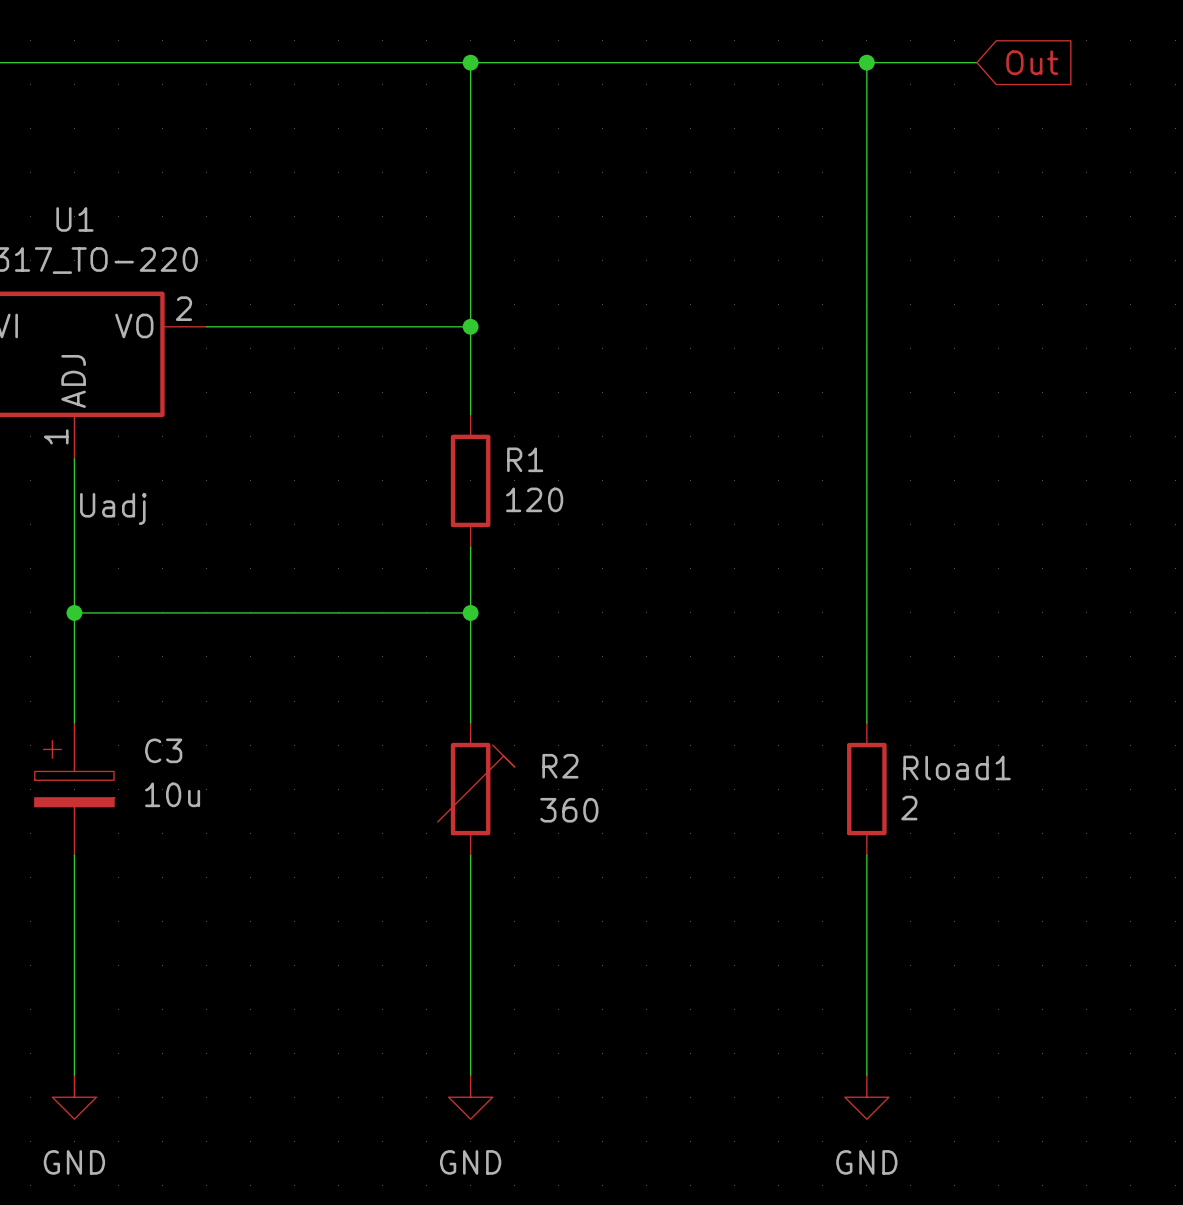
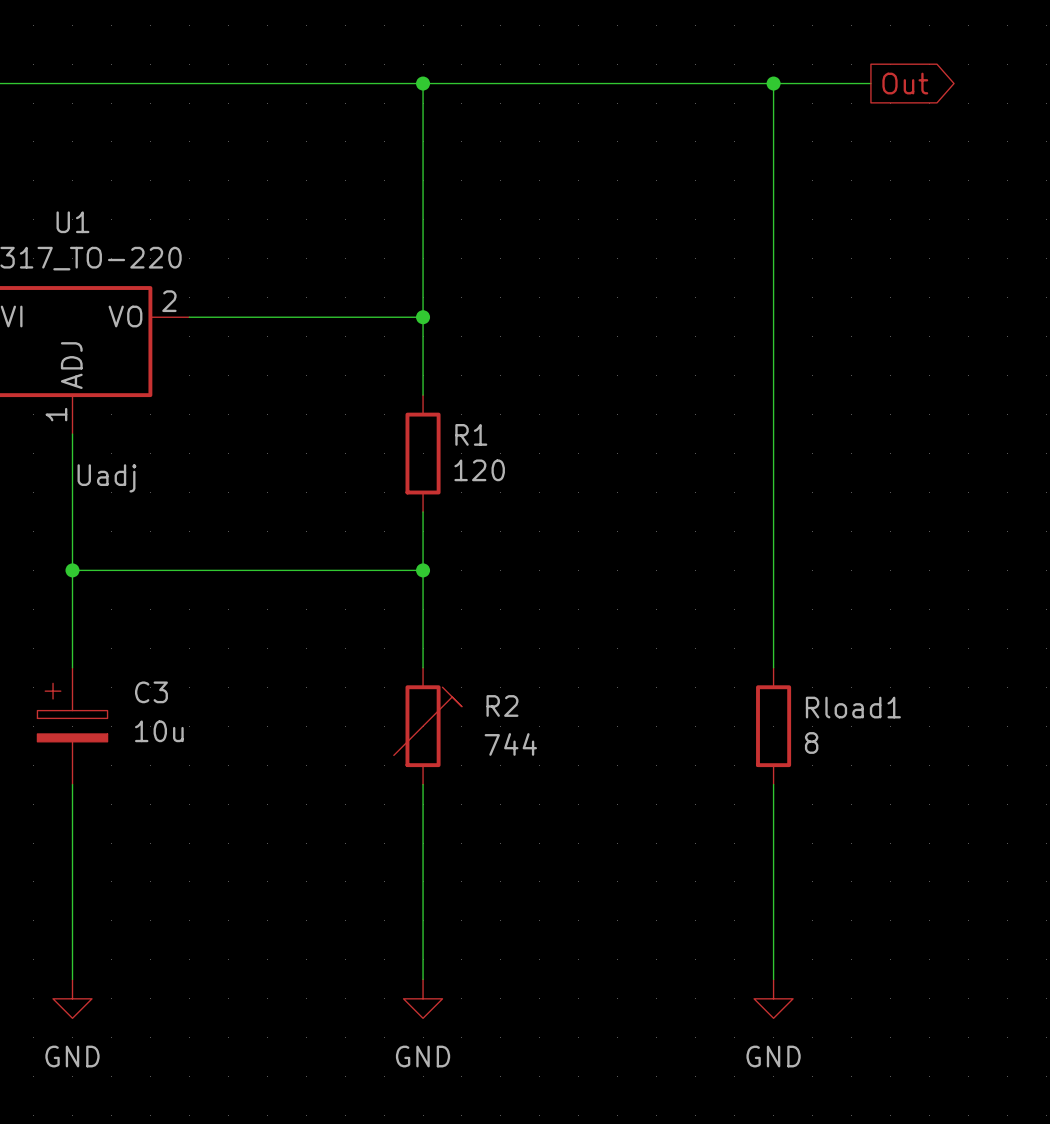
global label shape: input (1032, 62) -> output (905, 83)
Rload1 value: 2 (909, 808) -> 8 (811, 742)
R2 value: 360 (569, 810) -> 744 (510, 744)

